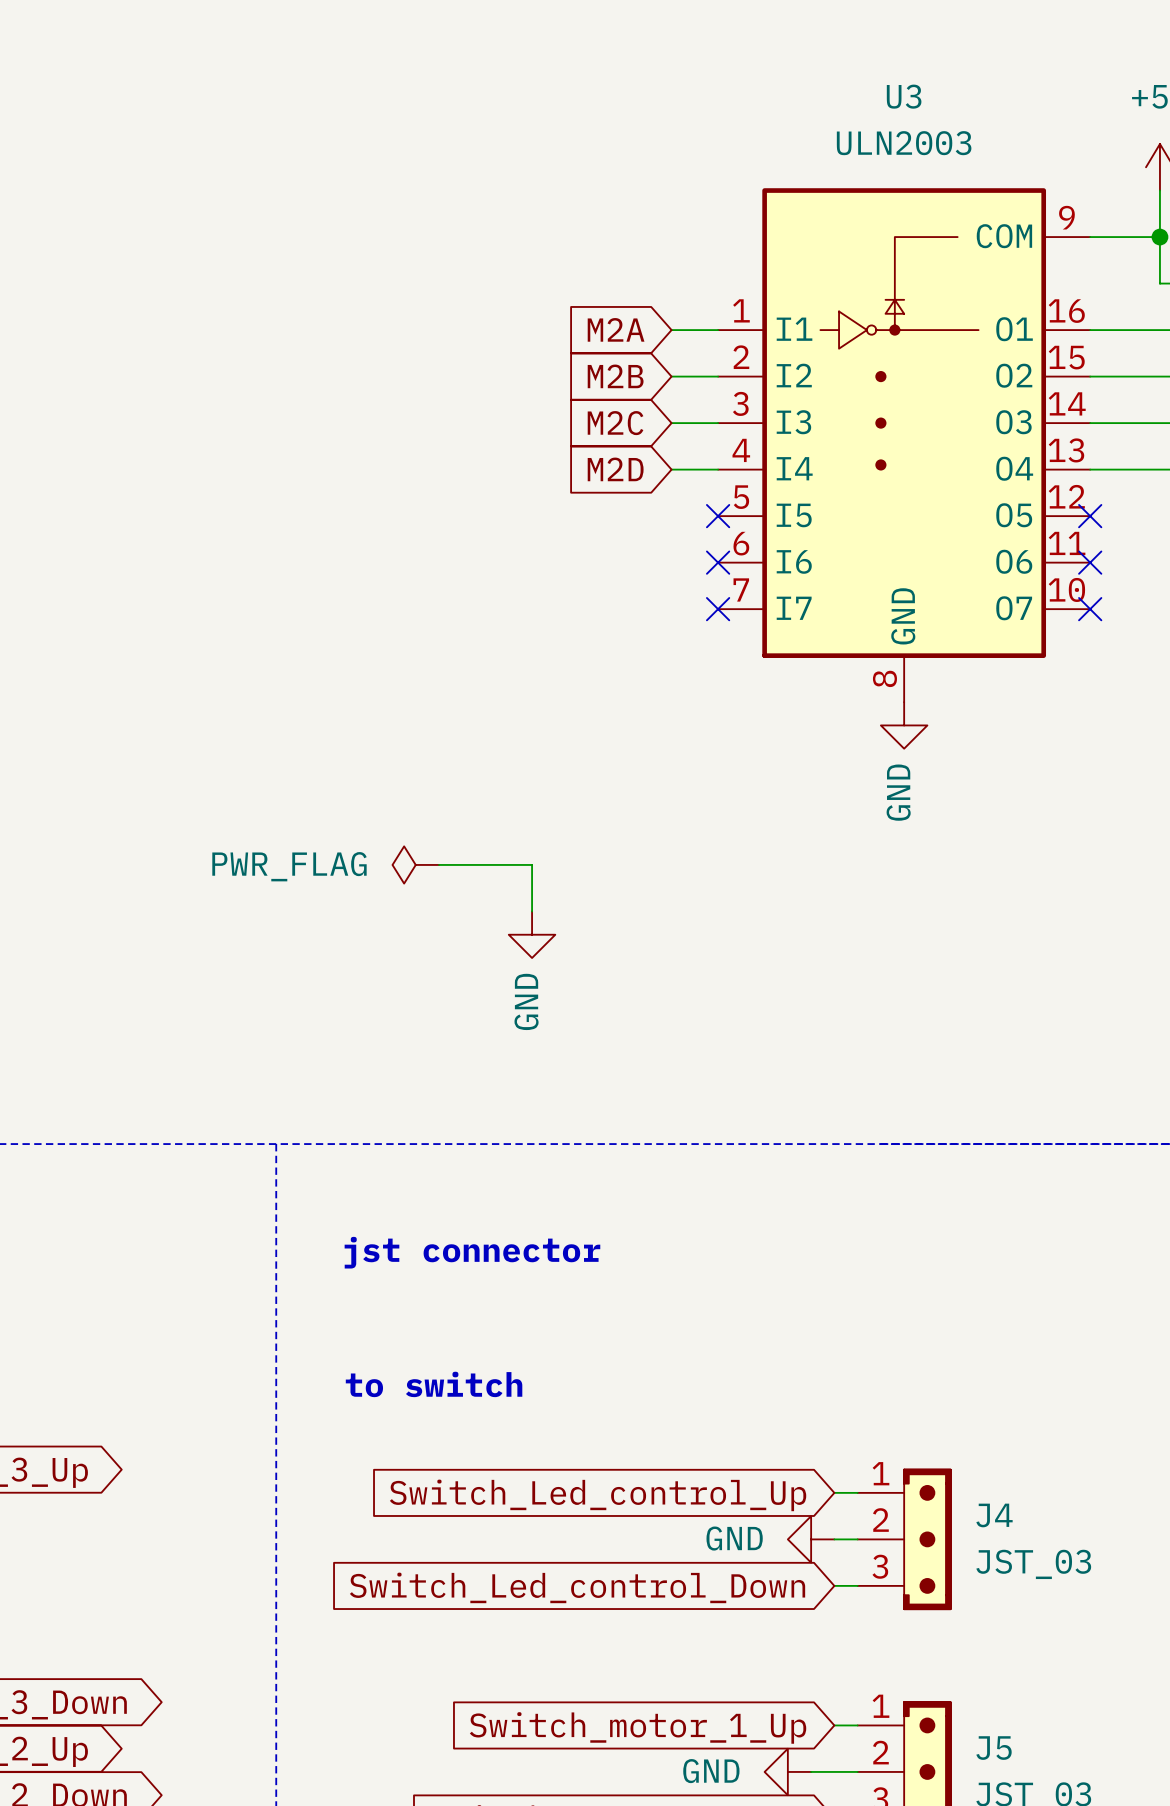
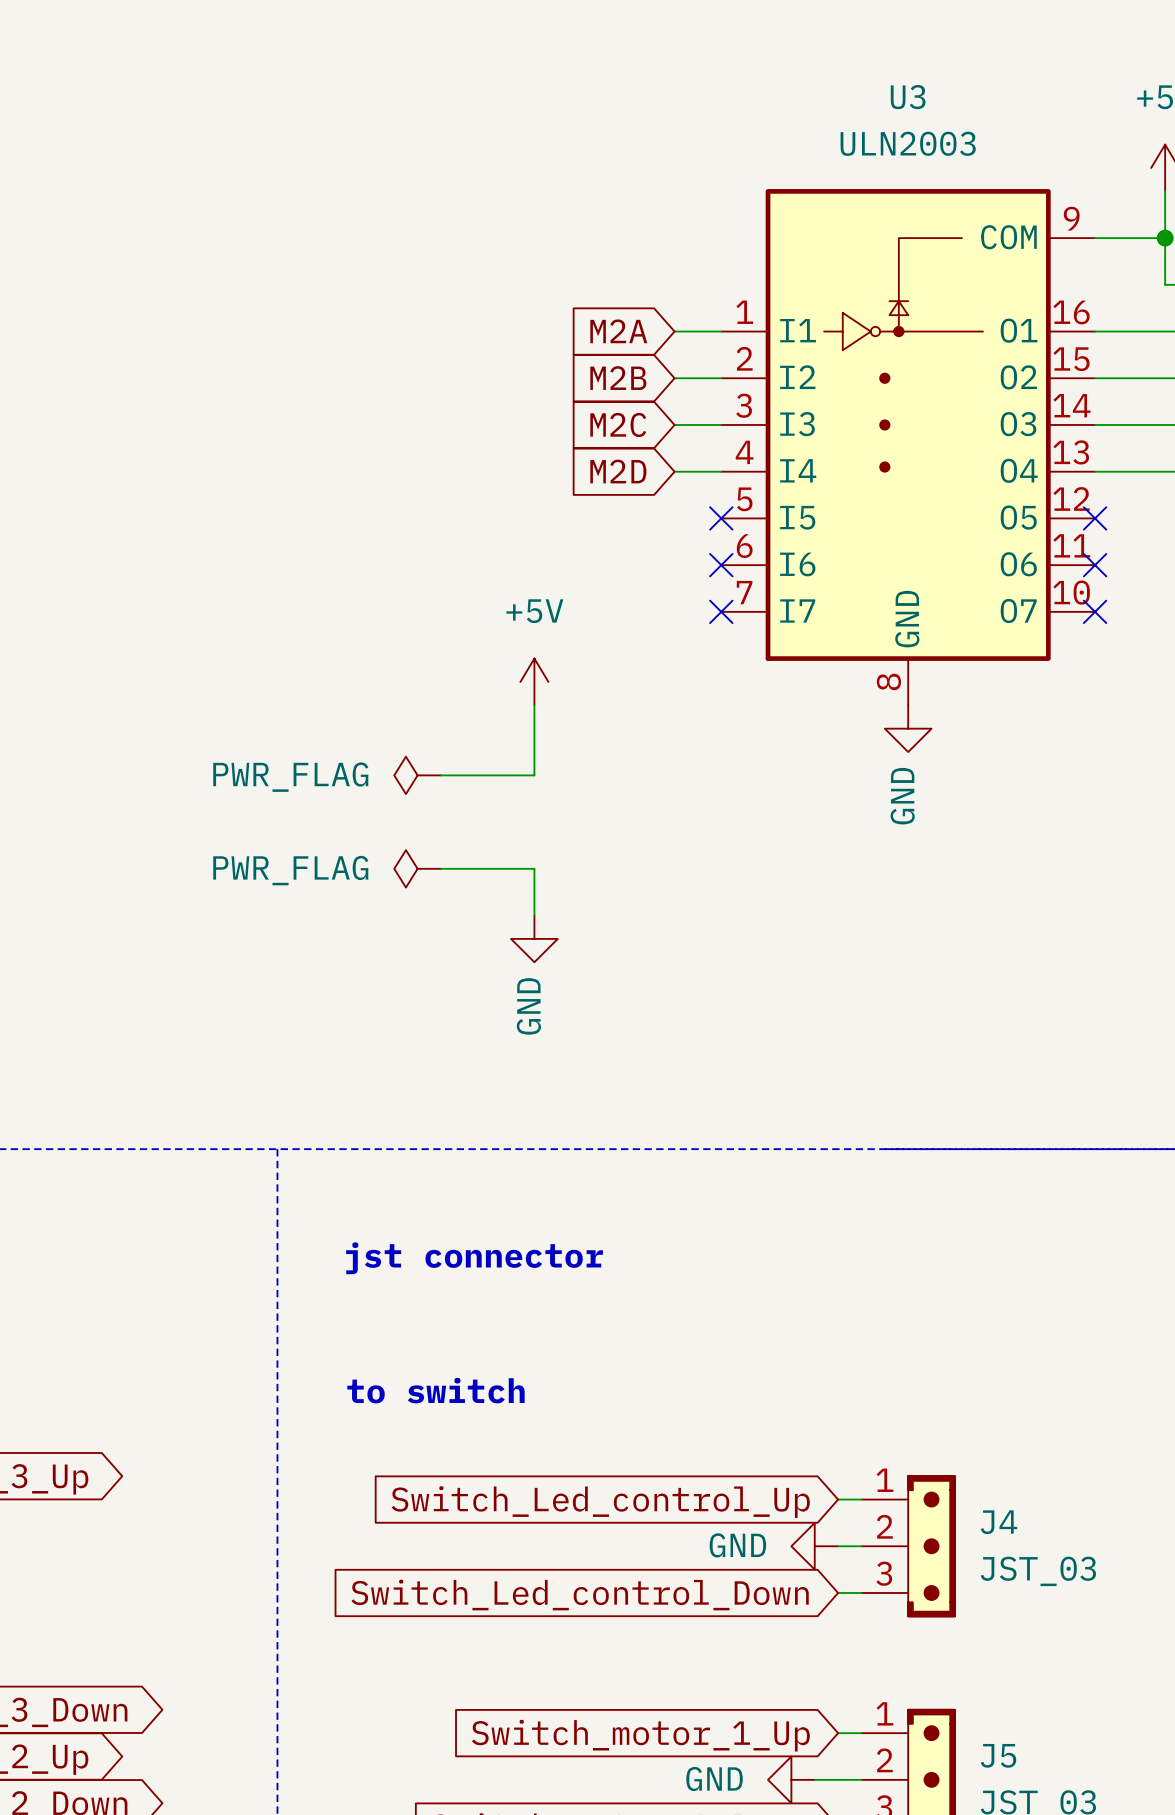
power symbol: none -> +5V (534, 681)
wire: none -> (534, 705) (534, 775) (440, 775)
power symbol: none -> PWR_FLAG (417, 775)

